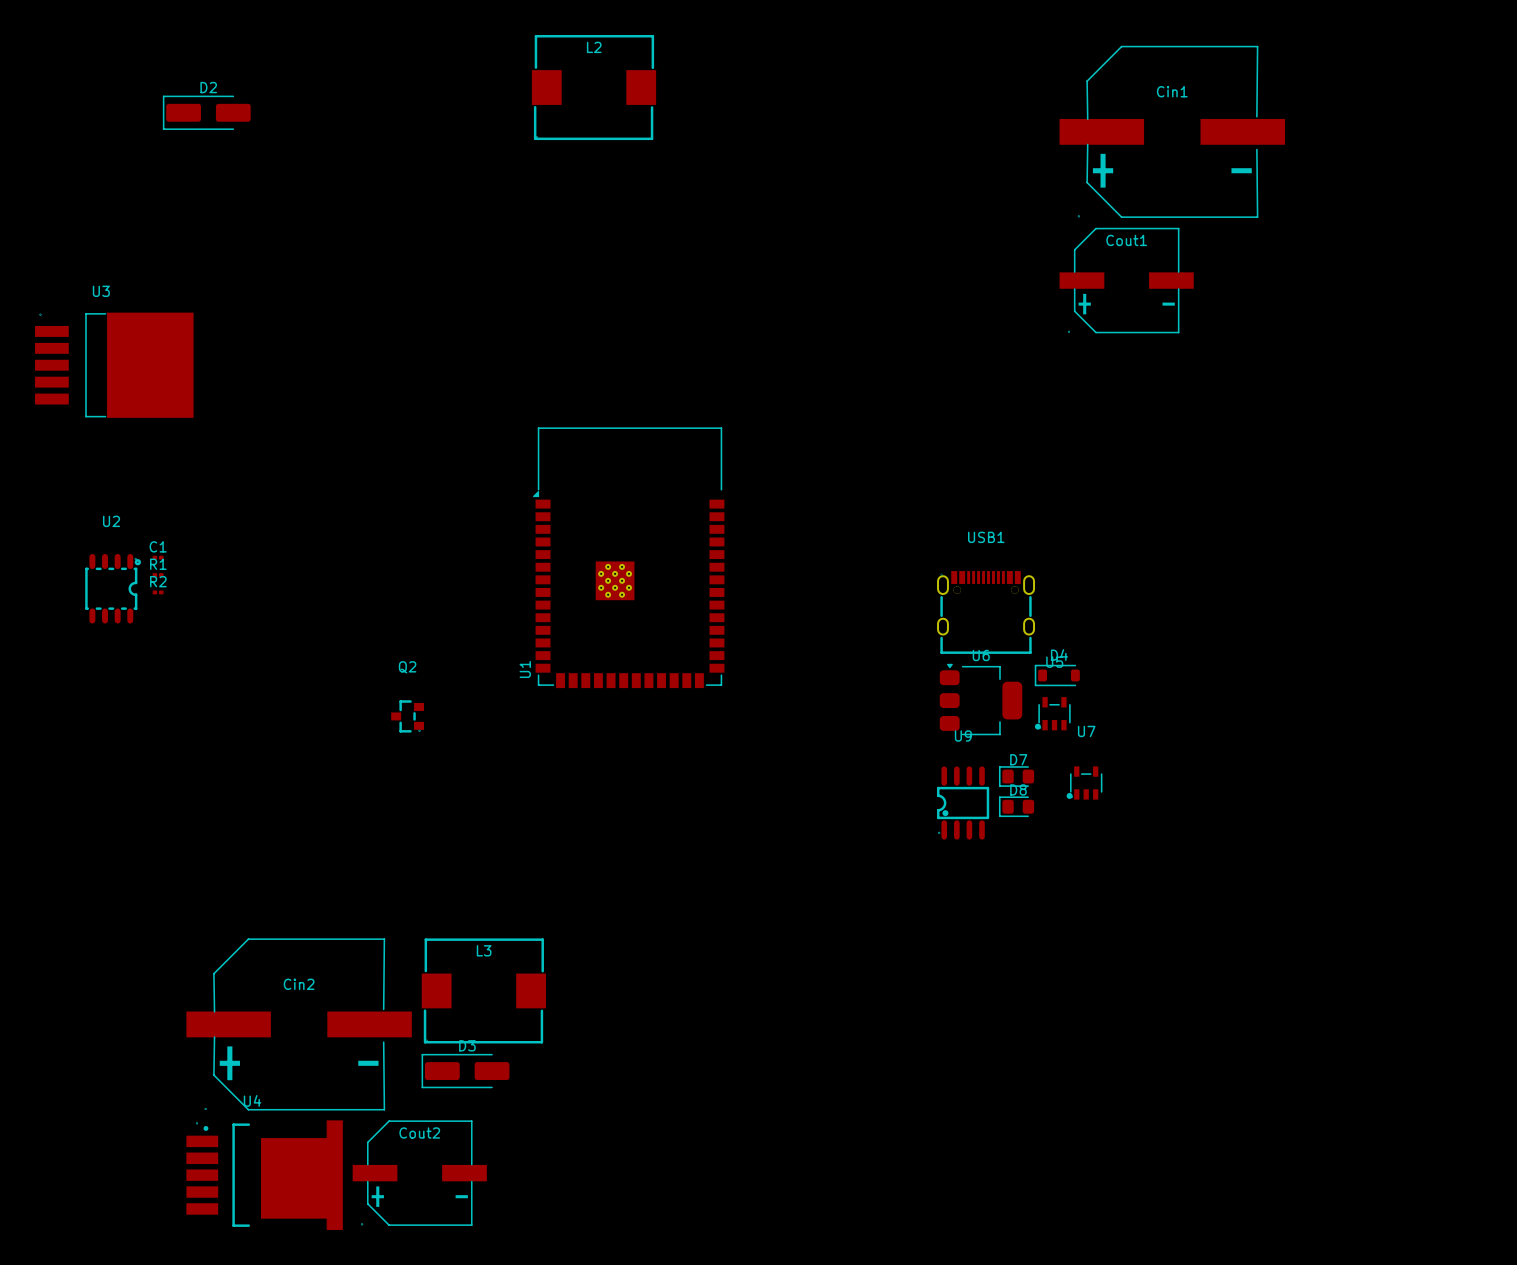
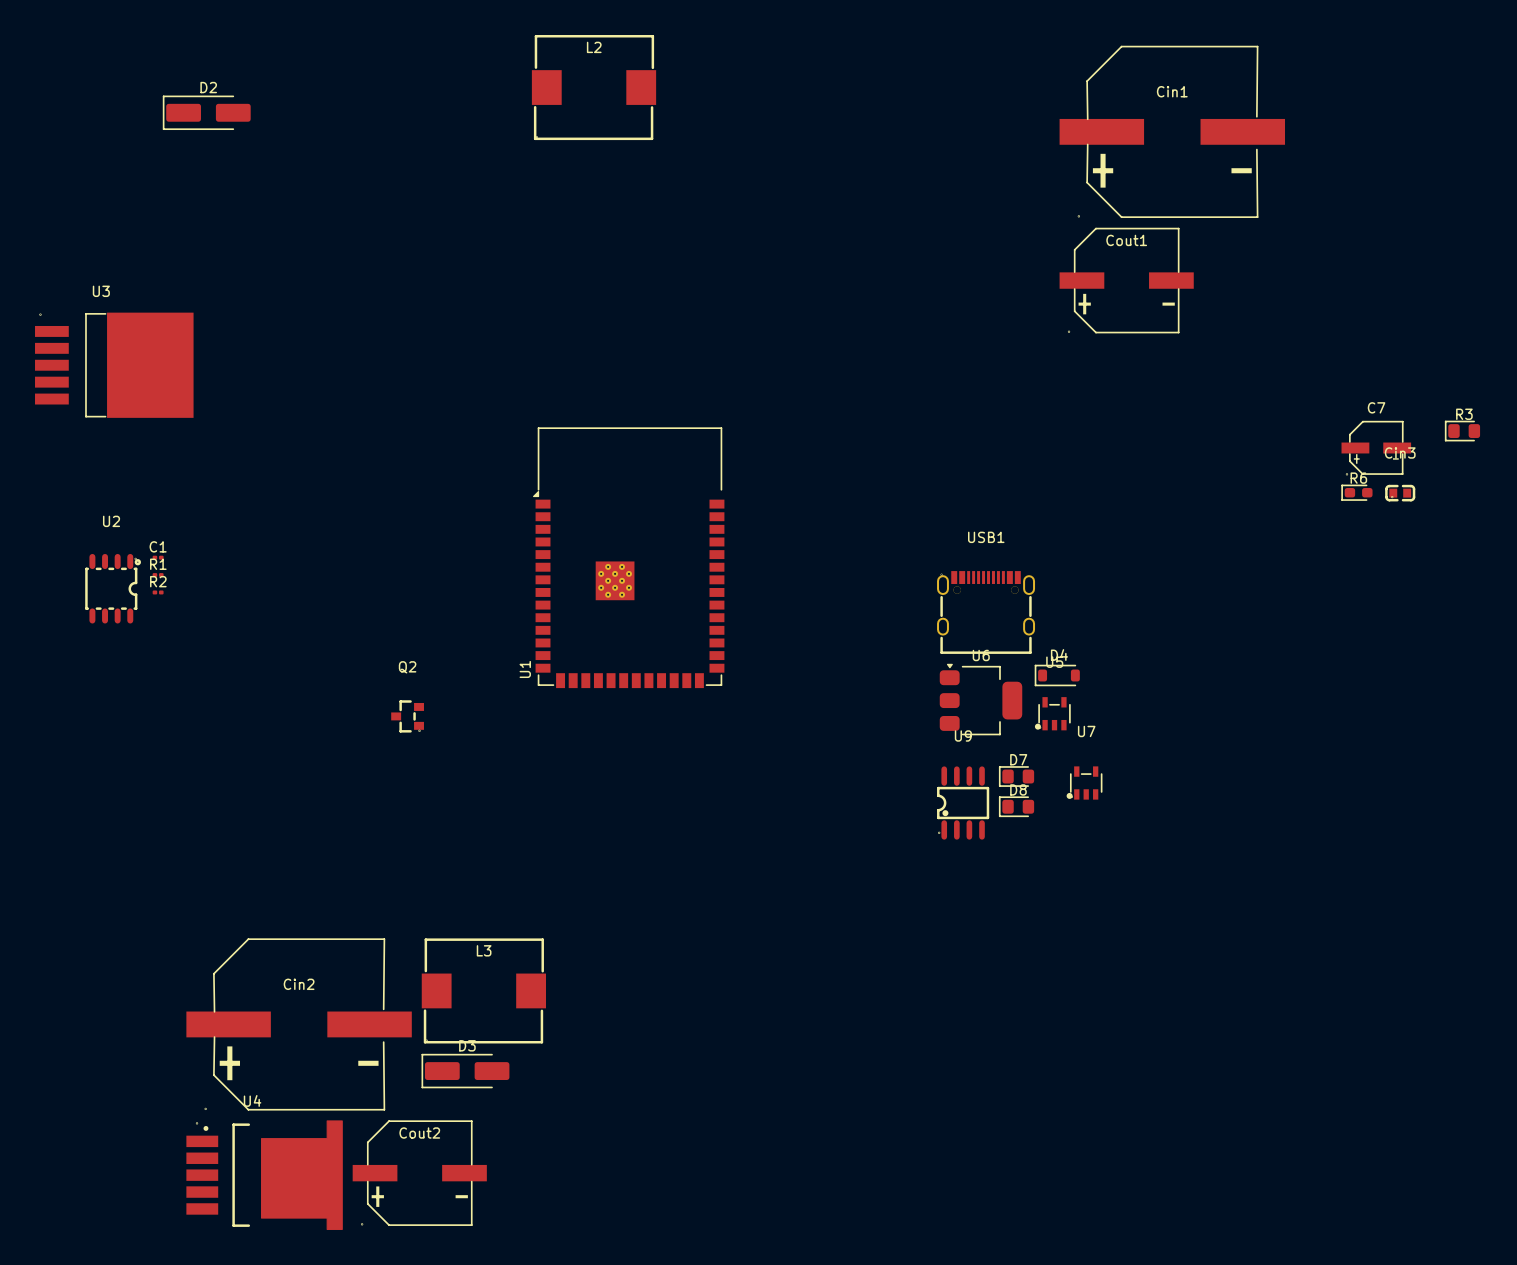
R3: none -> (1462, 431)
C7: none -> (1376, 447)
R6: none -> (1357, 492)
Cin3: none -> (1400, 493)

